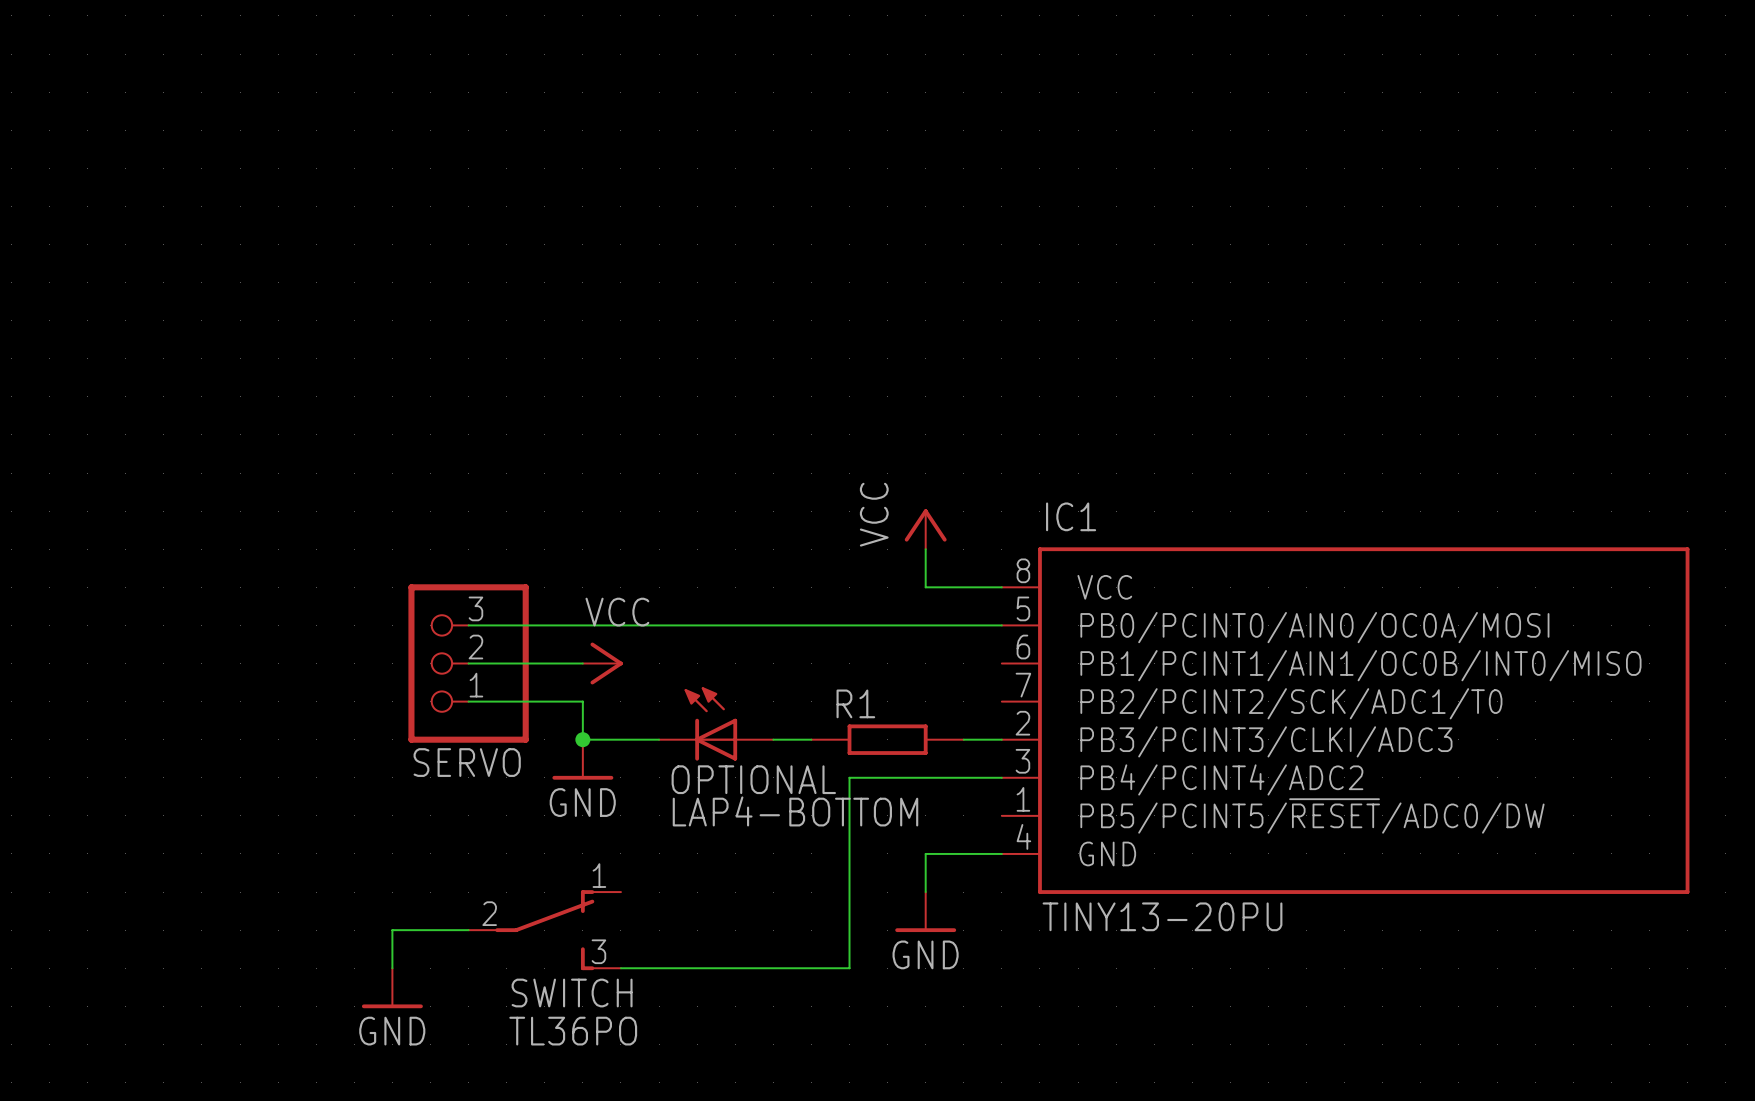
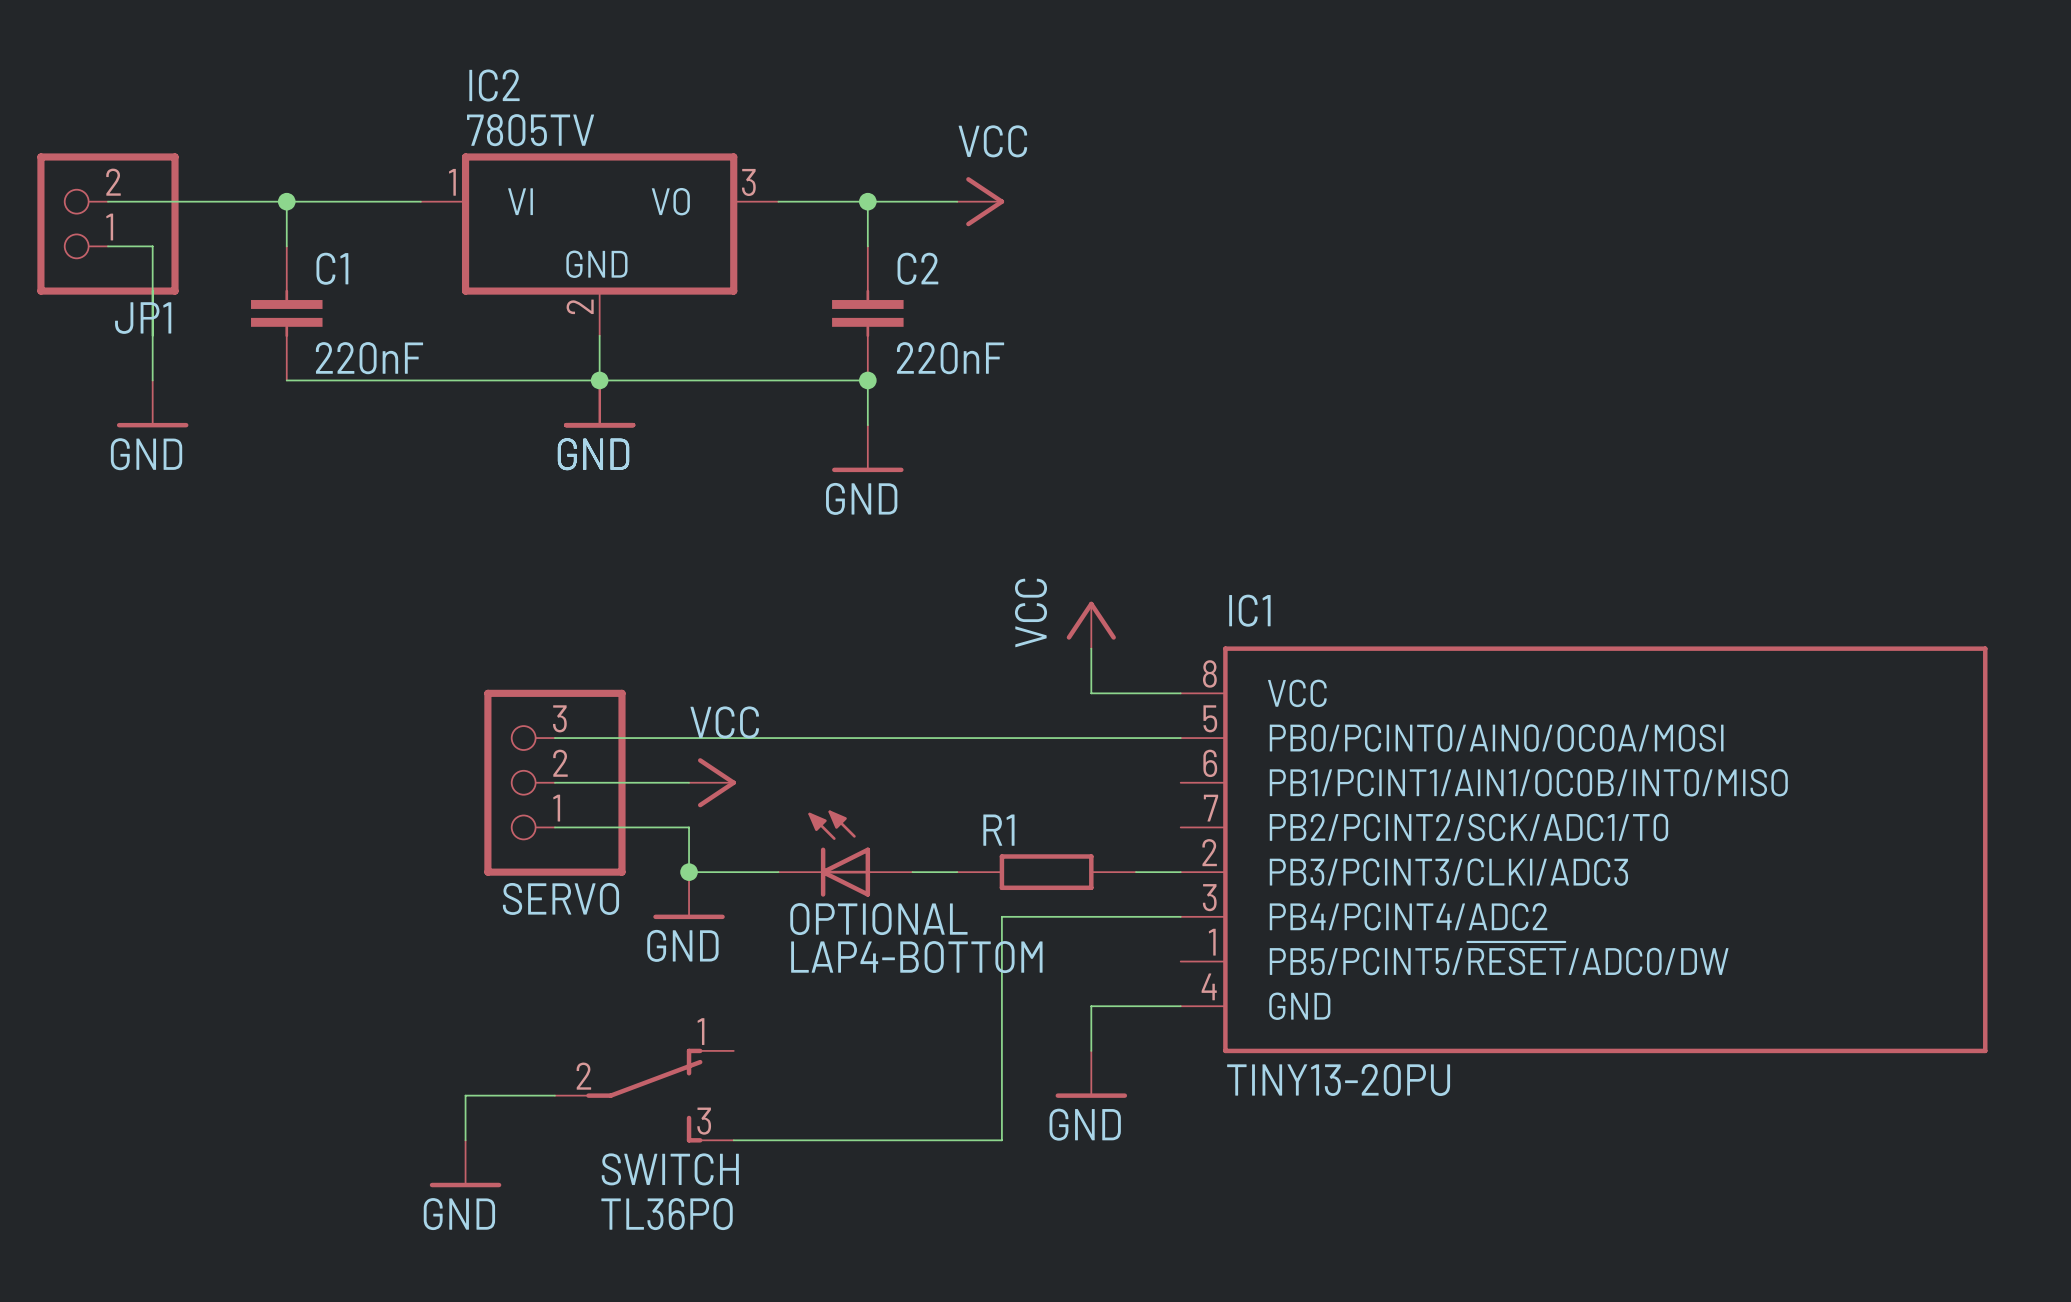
wire: none -> (107, 201) (420, 201)
wire: none -> (286, 201) (286, 246)
junction: none -> (286, 201)
wire: none -> (778, 201) (957, 201)
wire: none -> (867, 201) (867, 246)
junction: none -> (867, 201)
power symbol: none -> VCC (980, 201)
JP1: none -> (107, 224)
IC2: none -> 7805TV (599, 244)
wire: none -> (107, 246) (152, 246) (152, 380)
C1: none -> 220nF (286, 313)
C2: none -> 220nF (867, 313)
wire: none -> (599, 335) (599, 380)
wire: none -> (286, 380) (867, 380) (867, 425)
junction: none -> (599, 380)
junction: none -> (867, 380)
power symbol: none -> GND (152, 403)
power symbol: none -> GND (599, 403)
power symbol: none -> GND (867, 448)

